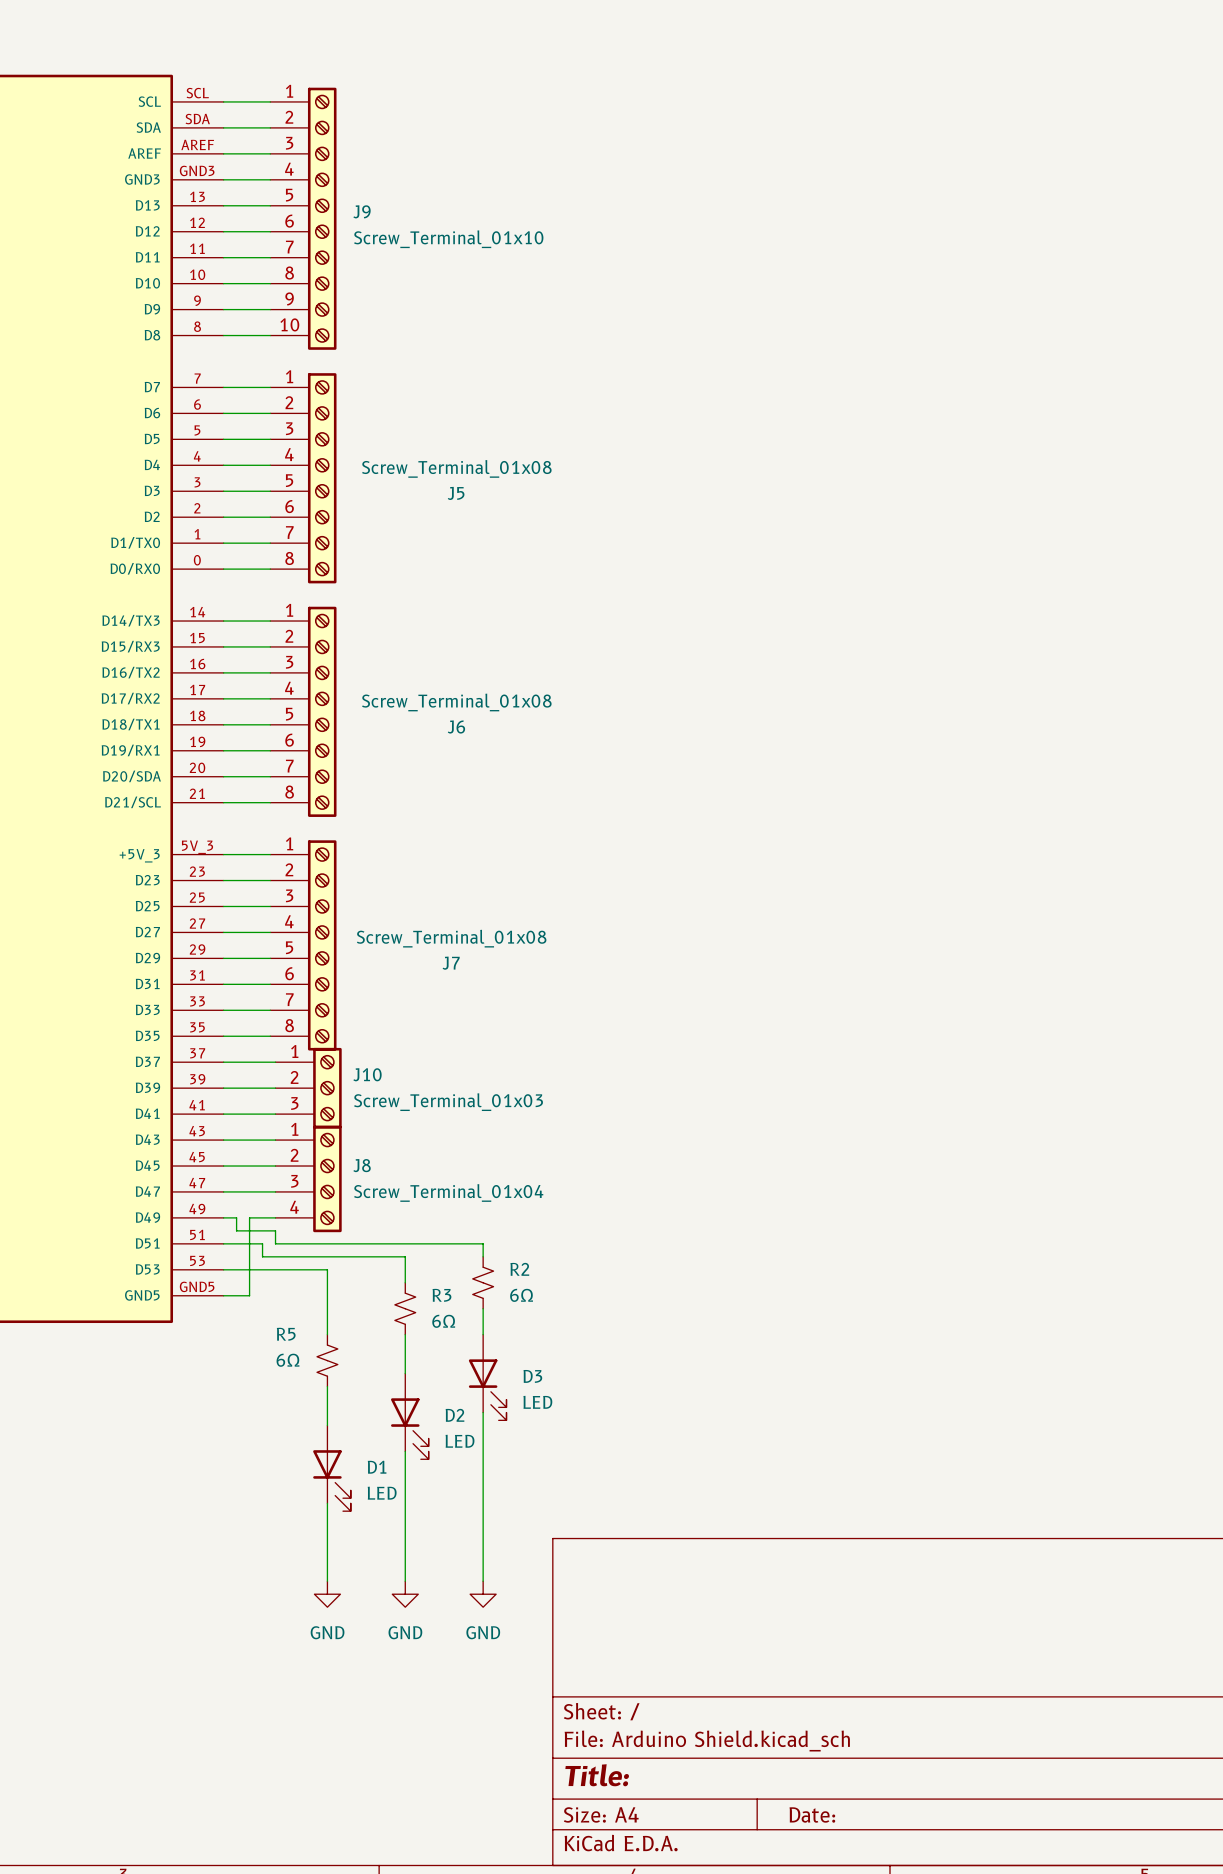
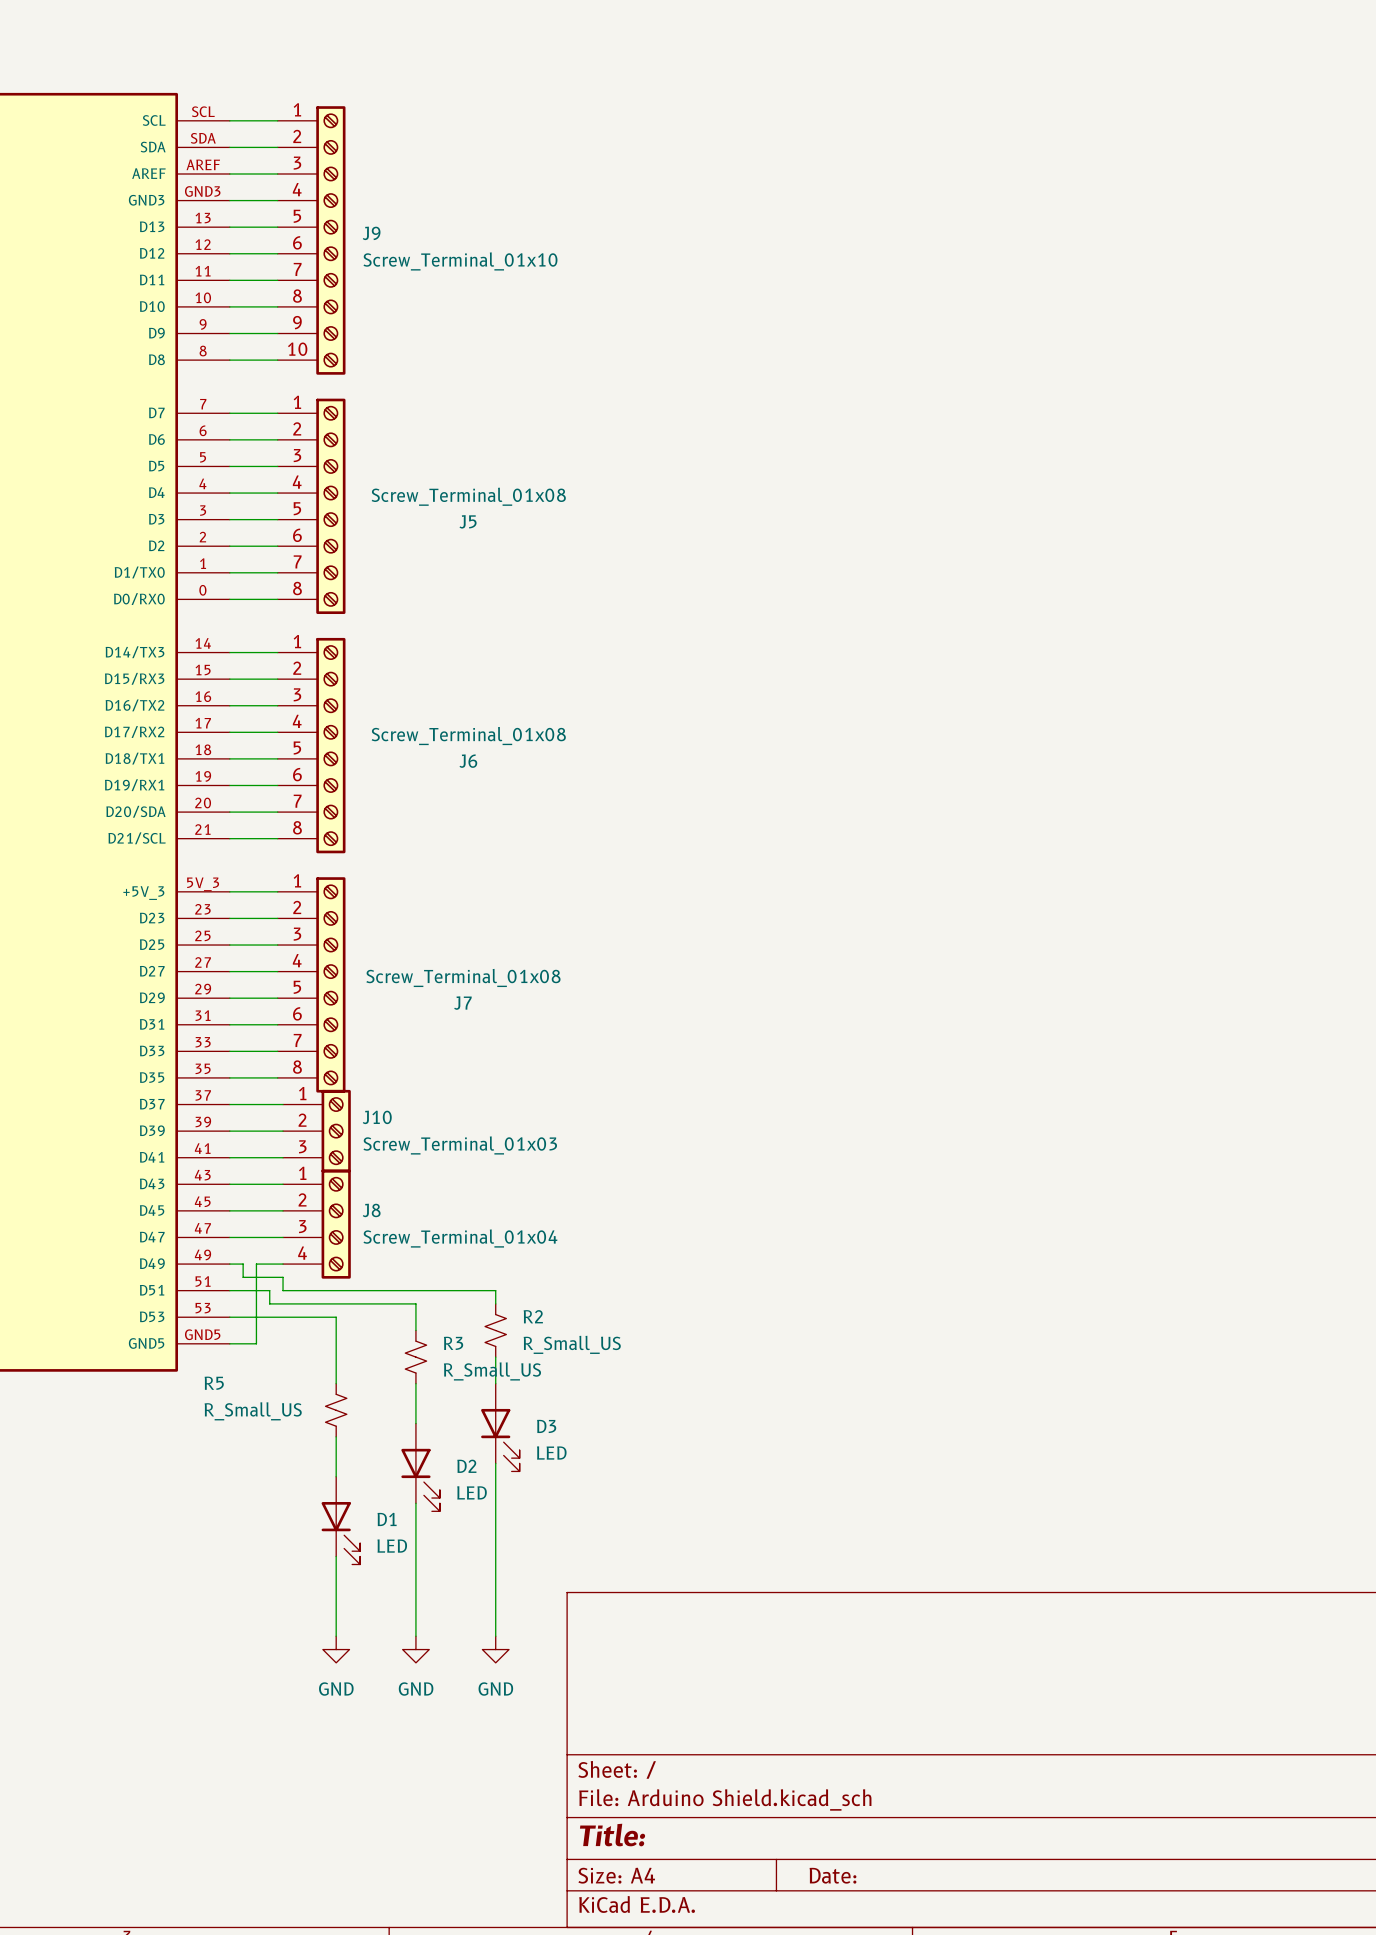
R2 value: 6Ω (521, 1295) -> R_Small_US (572, 1344)
R3 value: 6Ω (443, 1321) -> R_Small_US (492, 1371)
R5 name position: R5 (286, 1334) -> R5 (214, 1383)
R5 value: 6Ω (287, 1360) -> R_Small_US (253, 1411)

